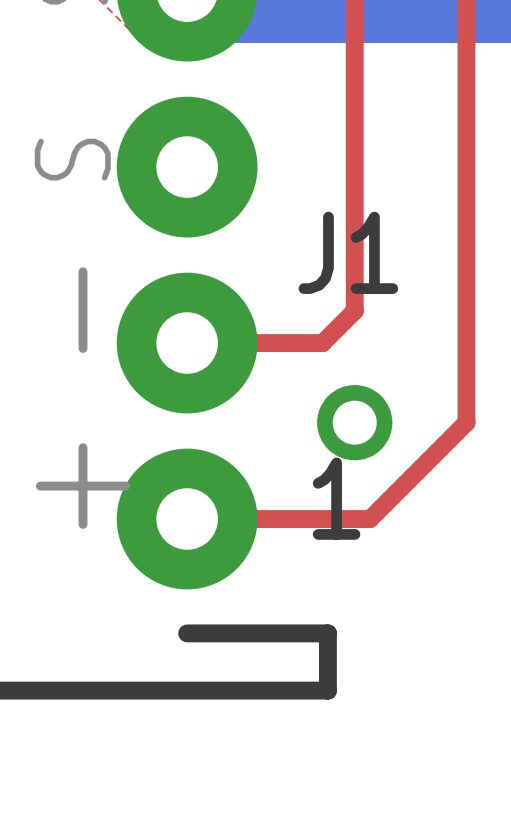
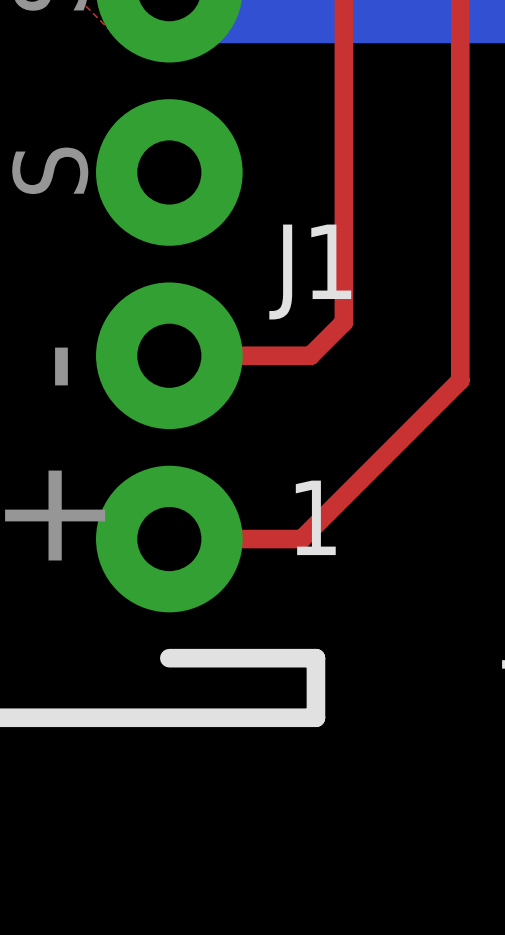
top track: (466, 366) (466, 422) (370, 519) (314, 519) -> (460, 380) (301, 539)
via: (354, 422) -> none

